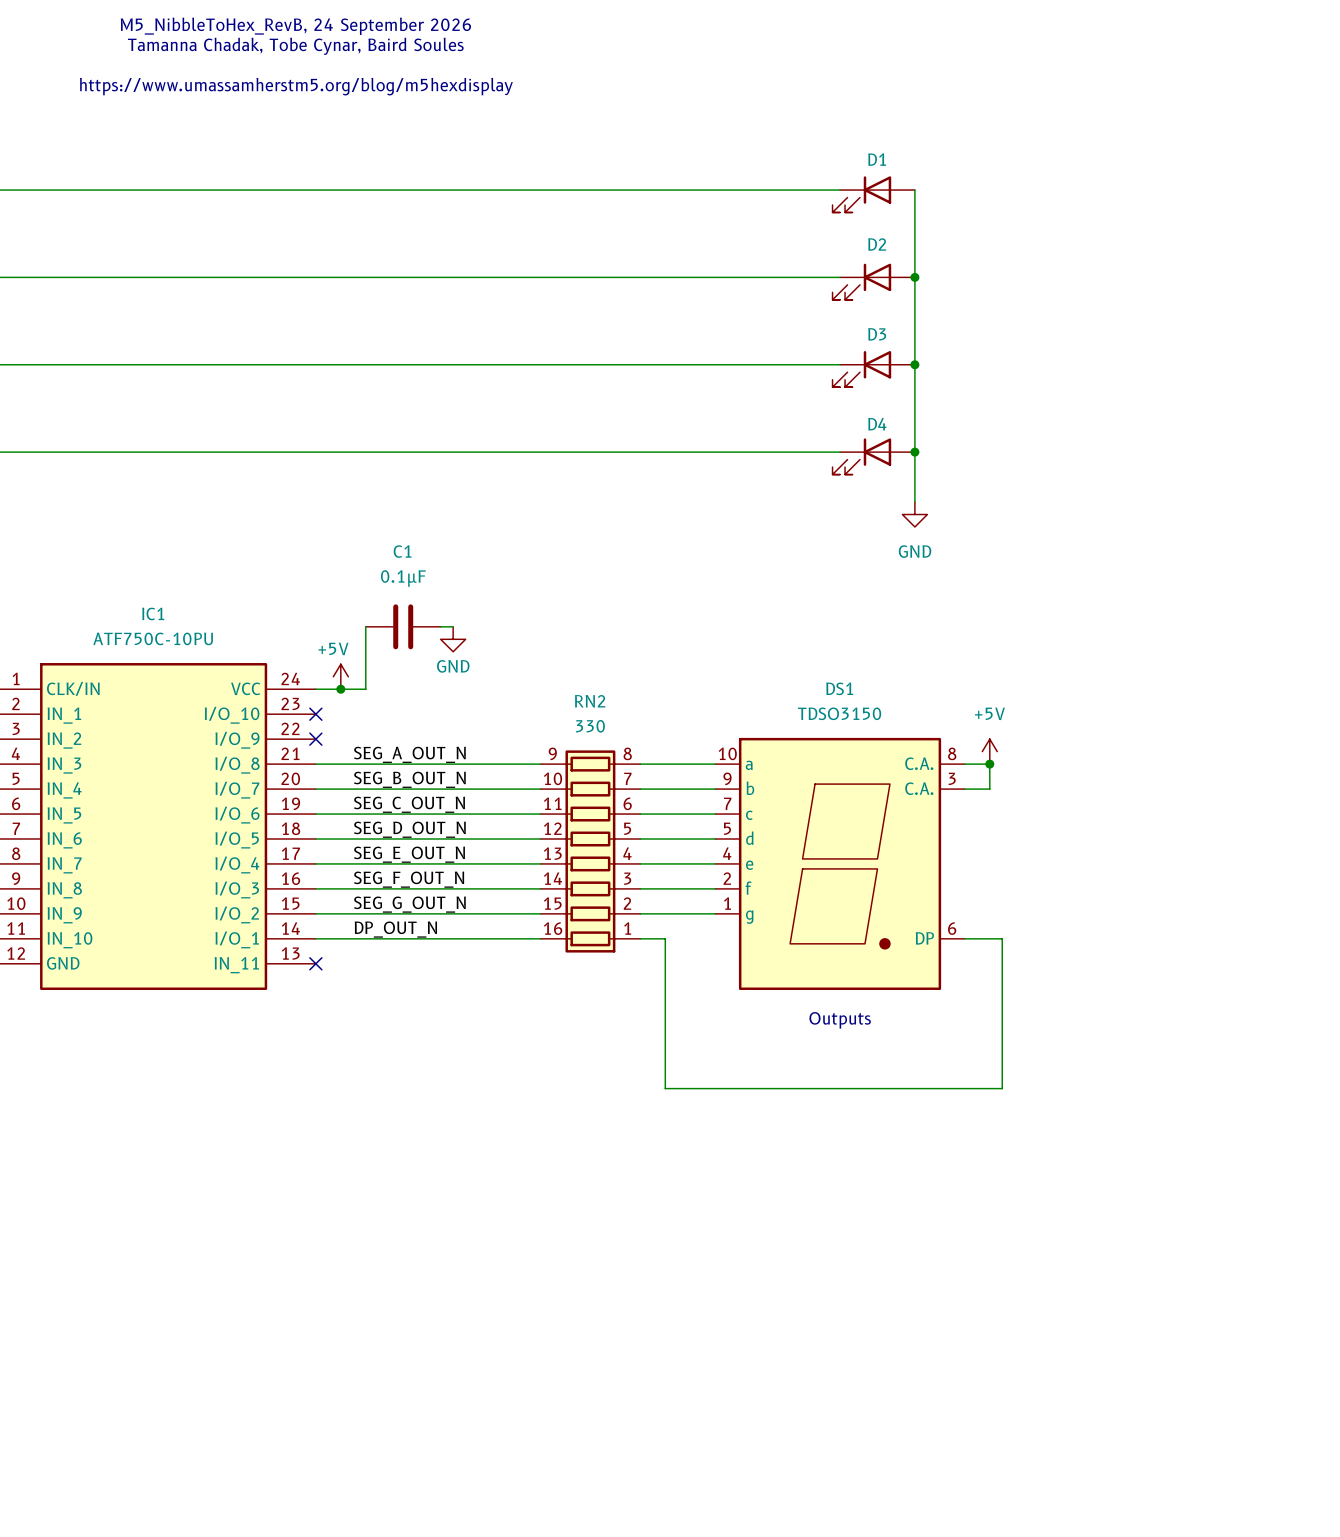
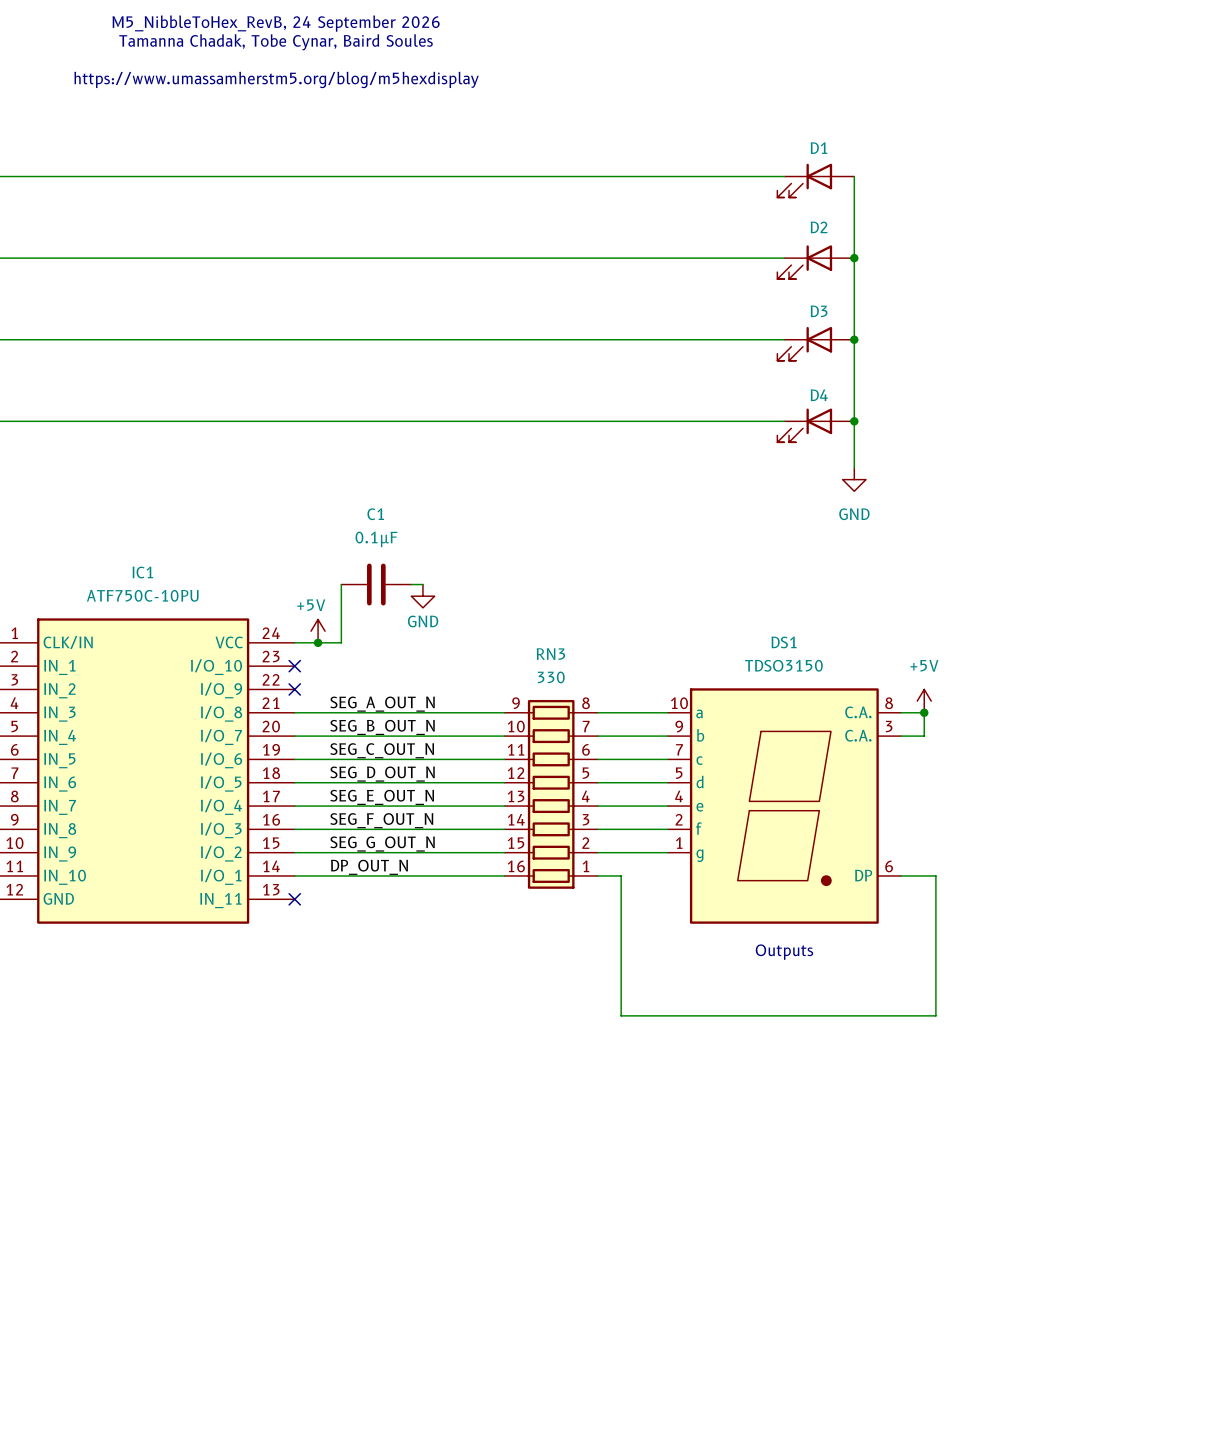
RN2 name: RN2 (590, 701) -> RN3 (550, 654)

